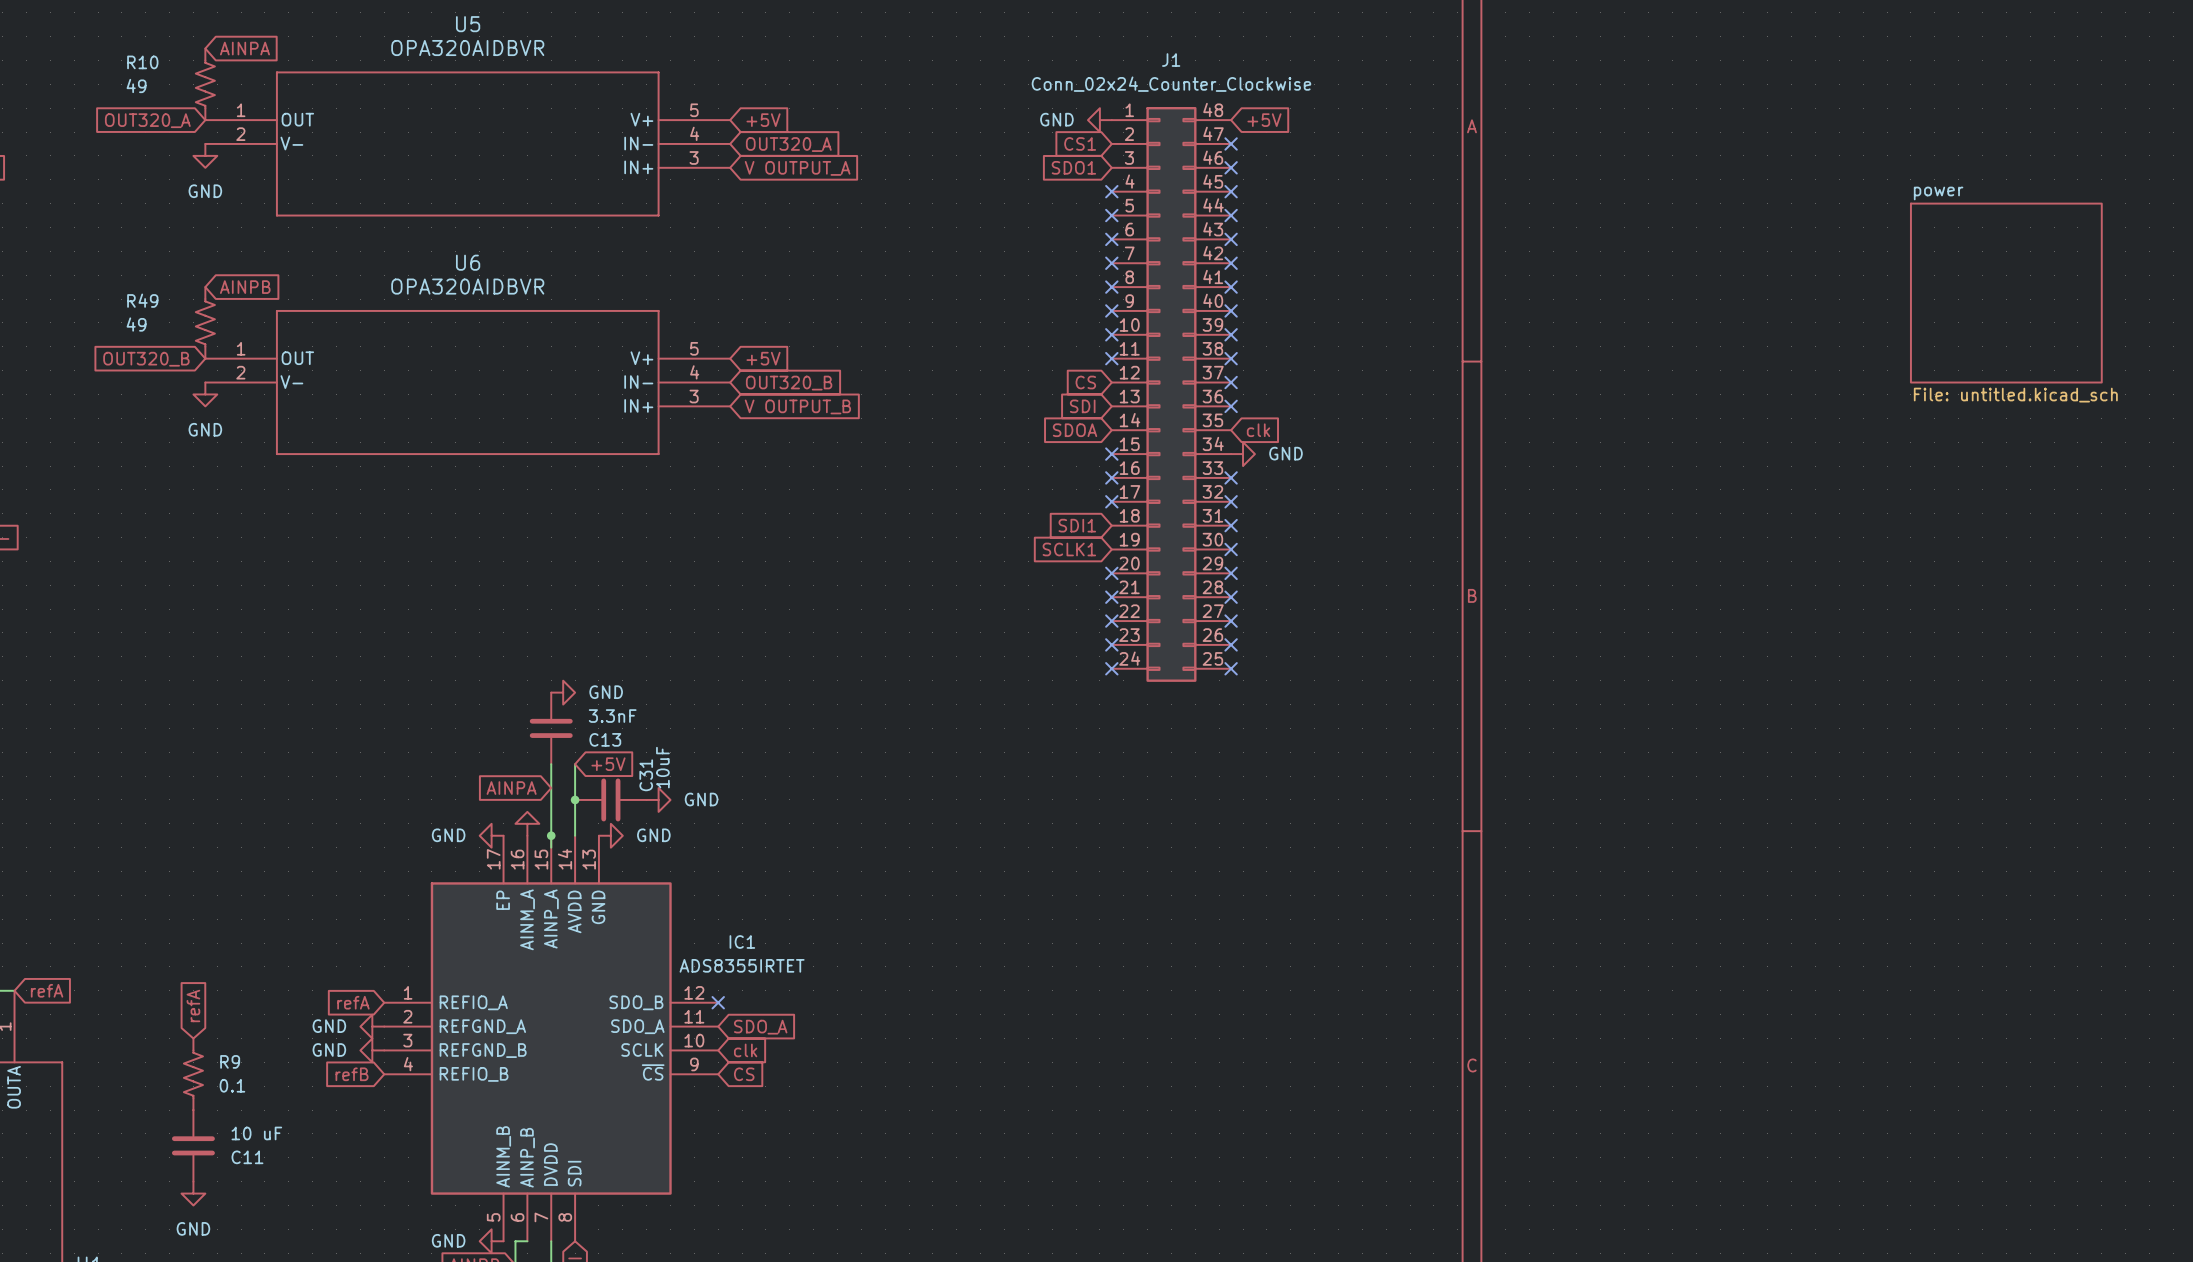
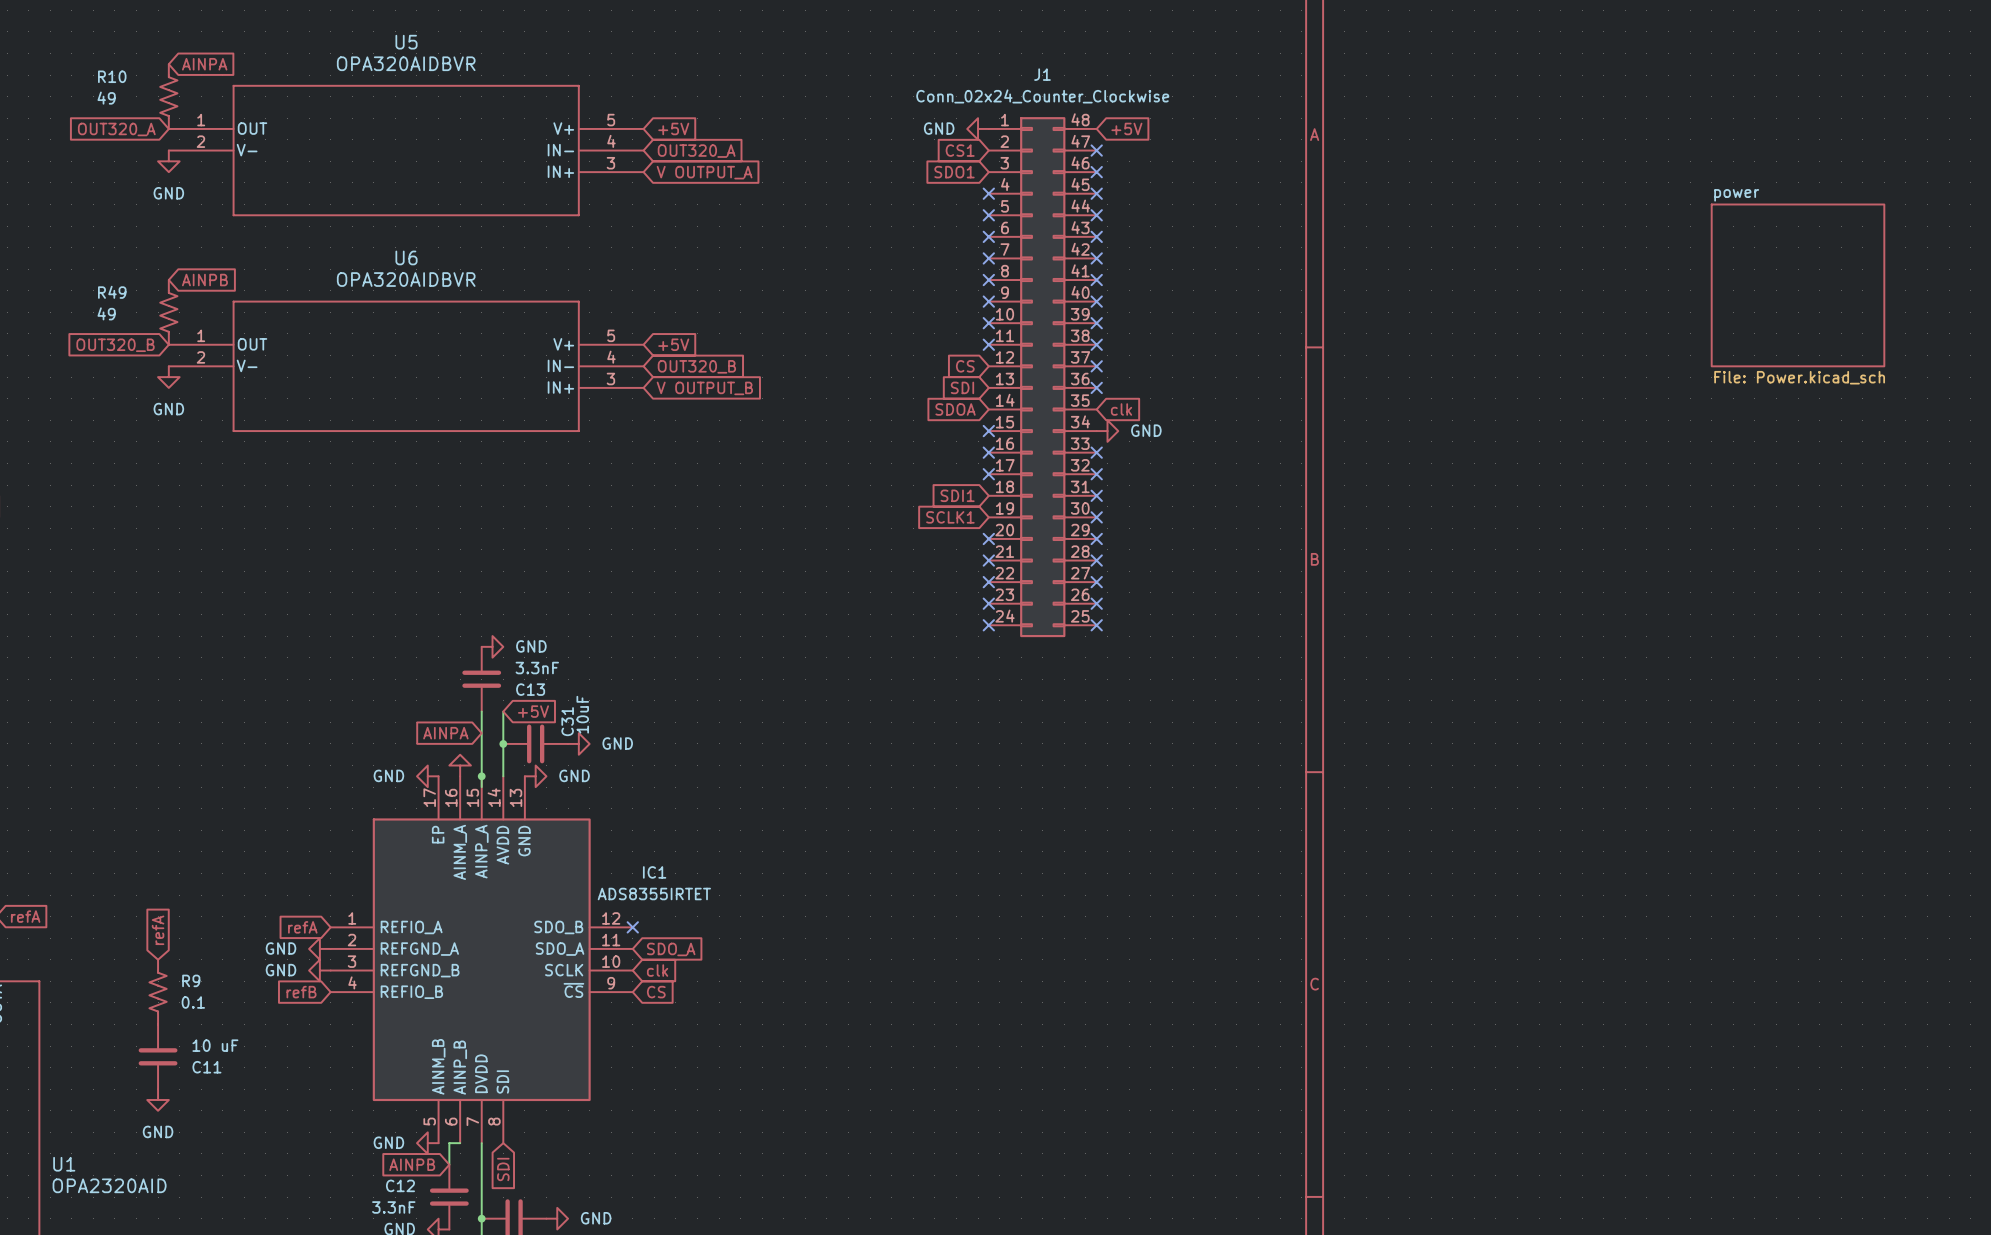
sheet power value: File: untitled.kicad_sch (2015, 395) -> File: Power.kicad_sch (1799, 377)

